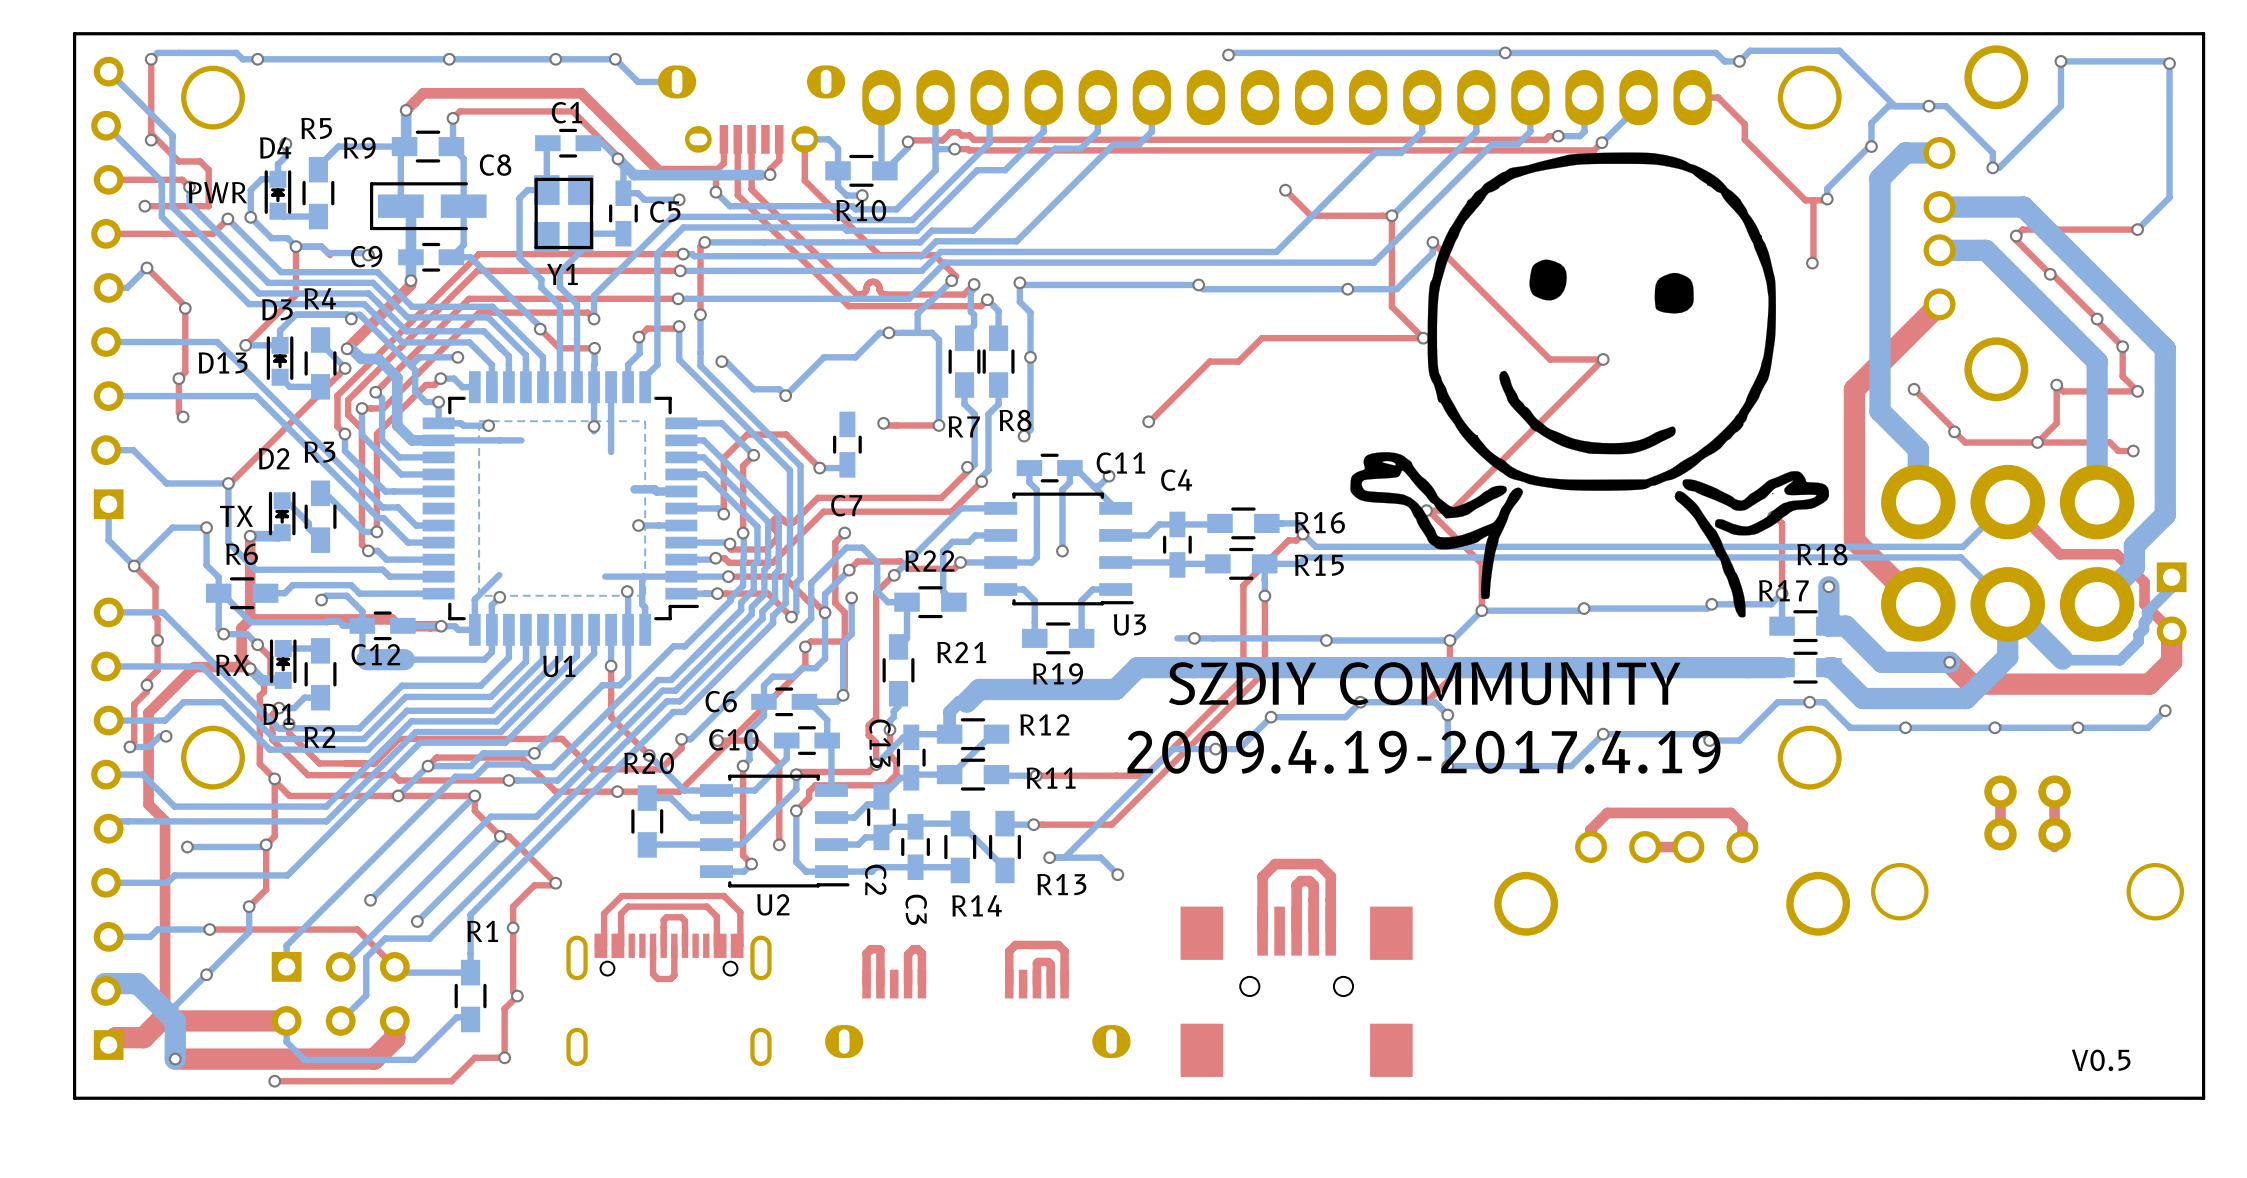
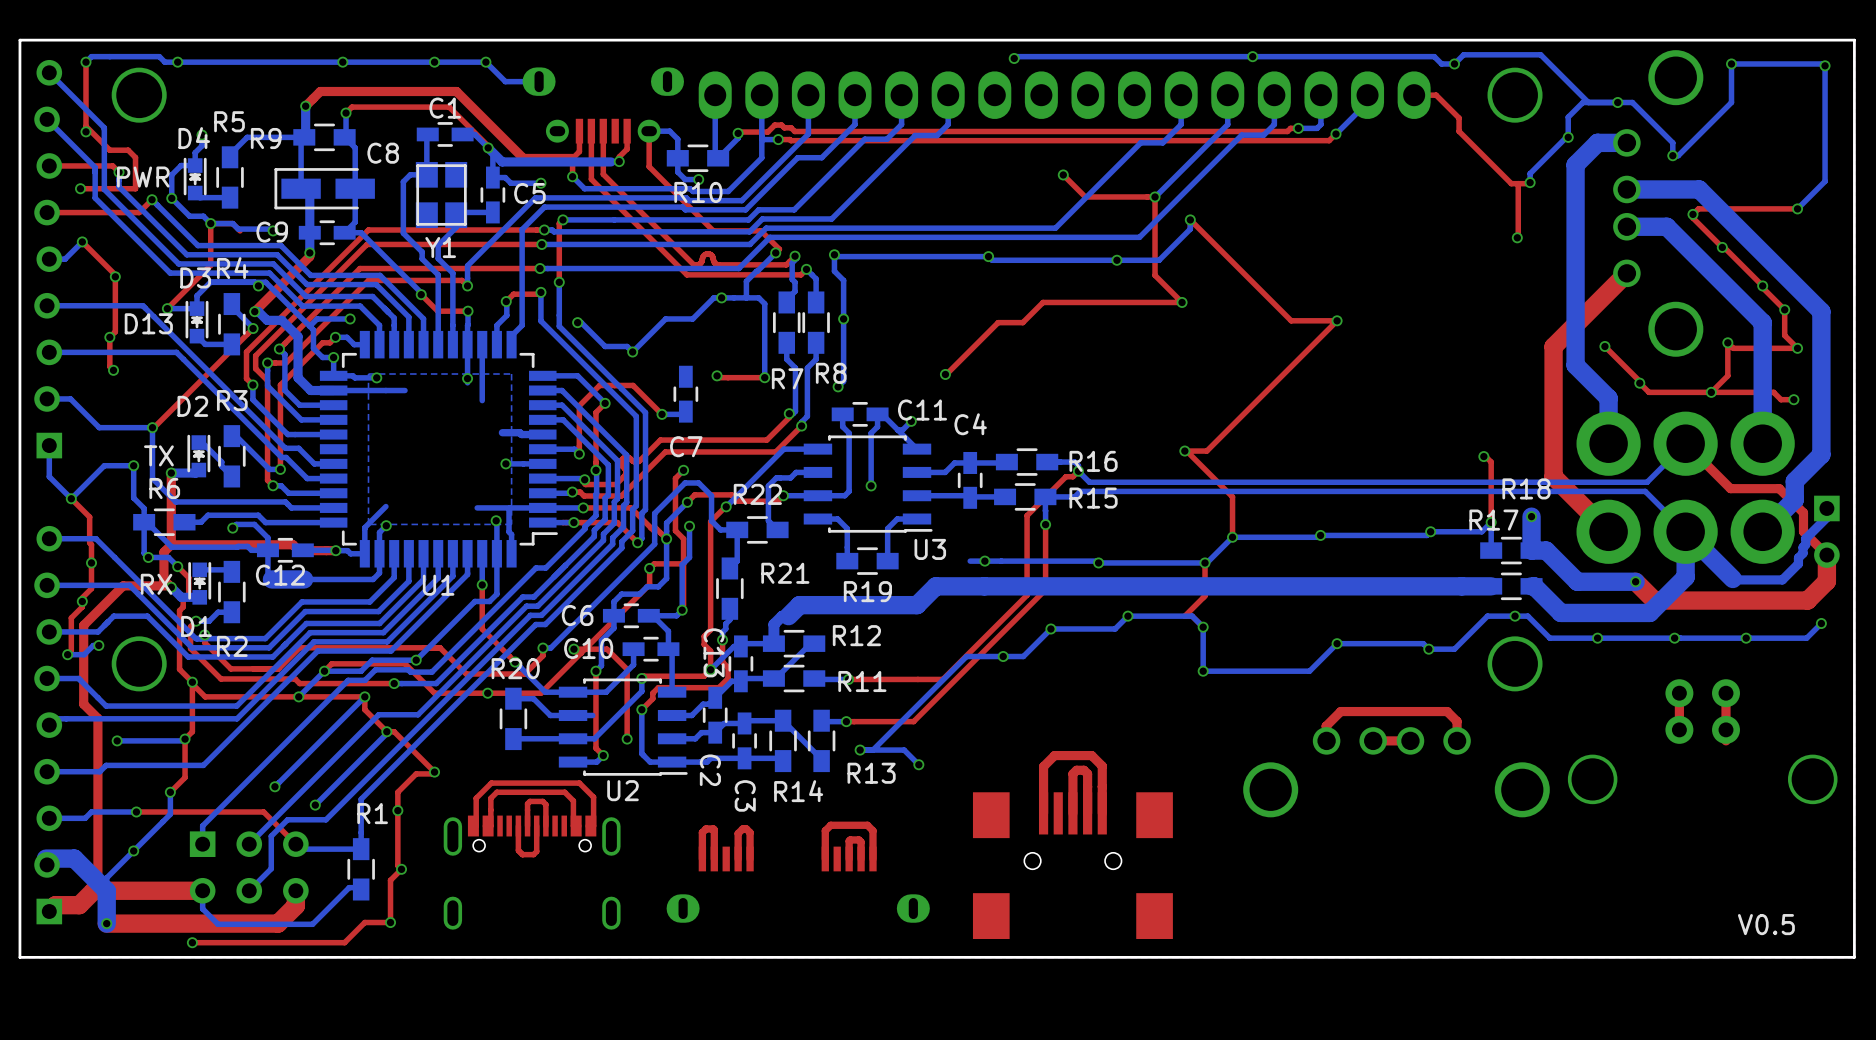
drawing: [1350, 152, 1830, 618] -> none
text: SZDIY COMMUNITY (1424, 683) -> none
text: 2009.4.19-2017.4.19 (1424, 752) -> none

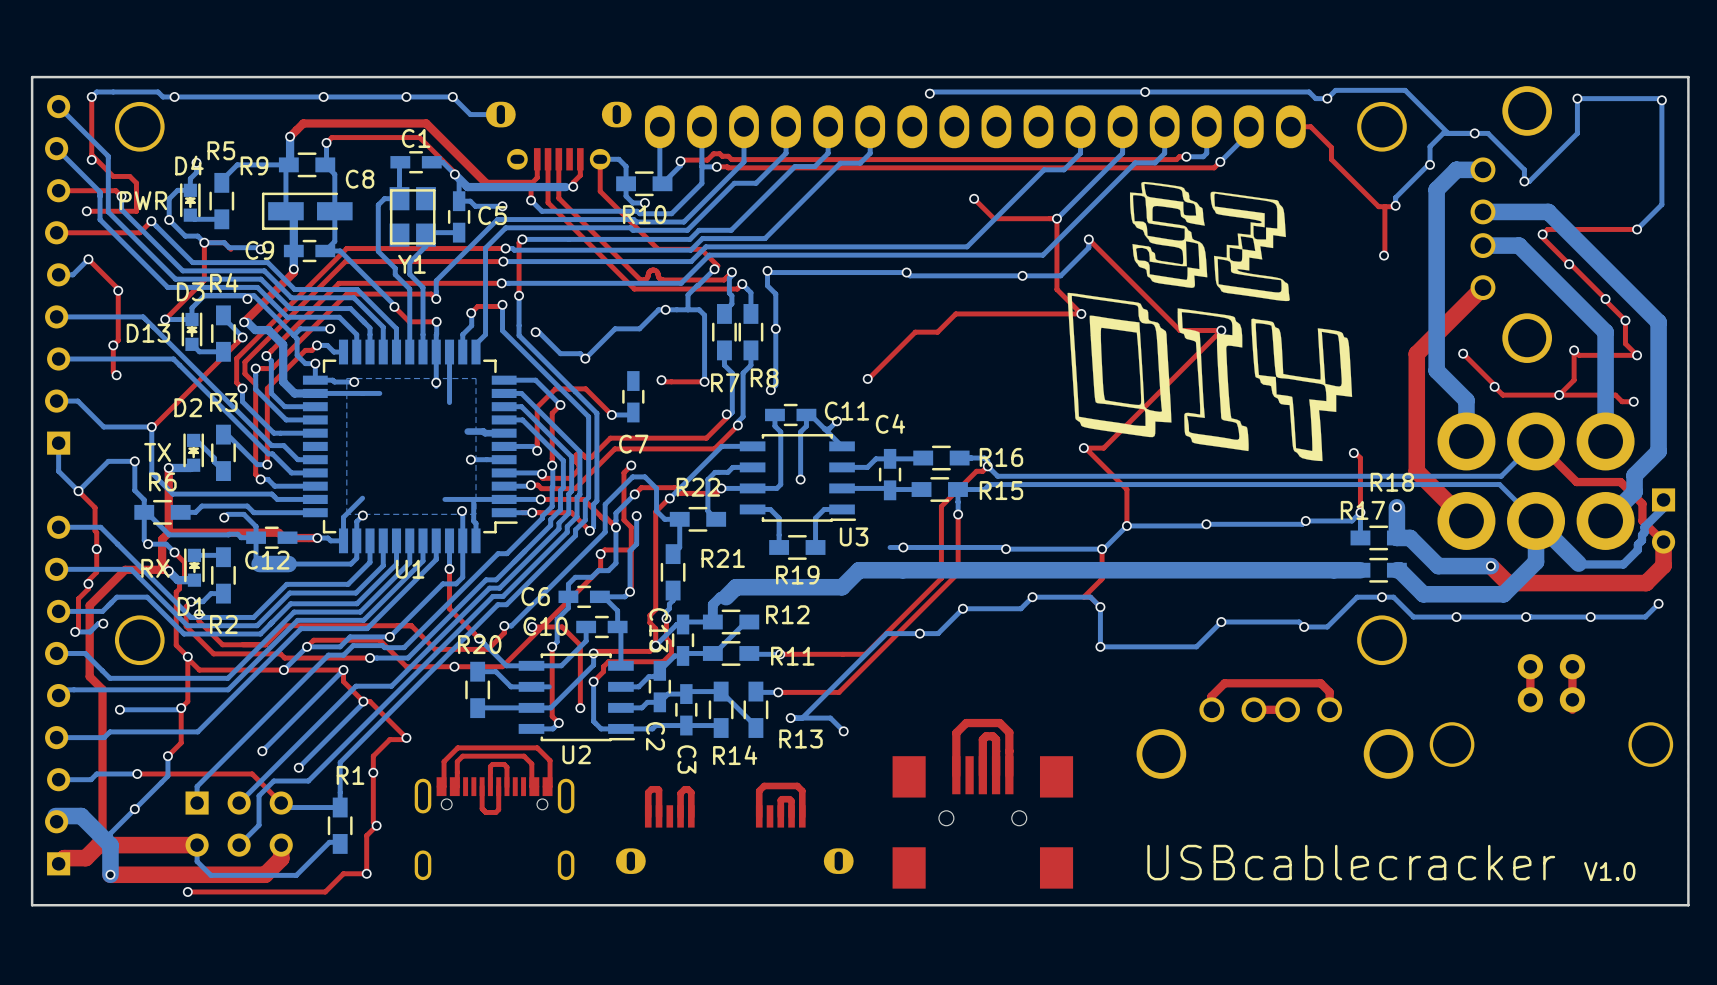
drawing: none -> [1067, 181, 1353, 462]
text: none -> USBcablecracker (1351, 862)
text: V0.5 (1766, 924) -> V1.0 (1609, 871)

